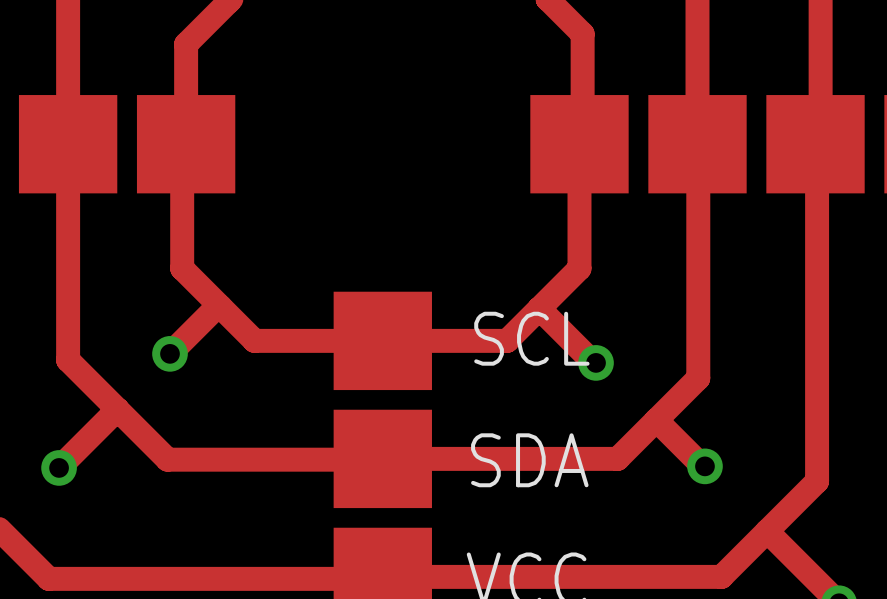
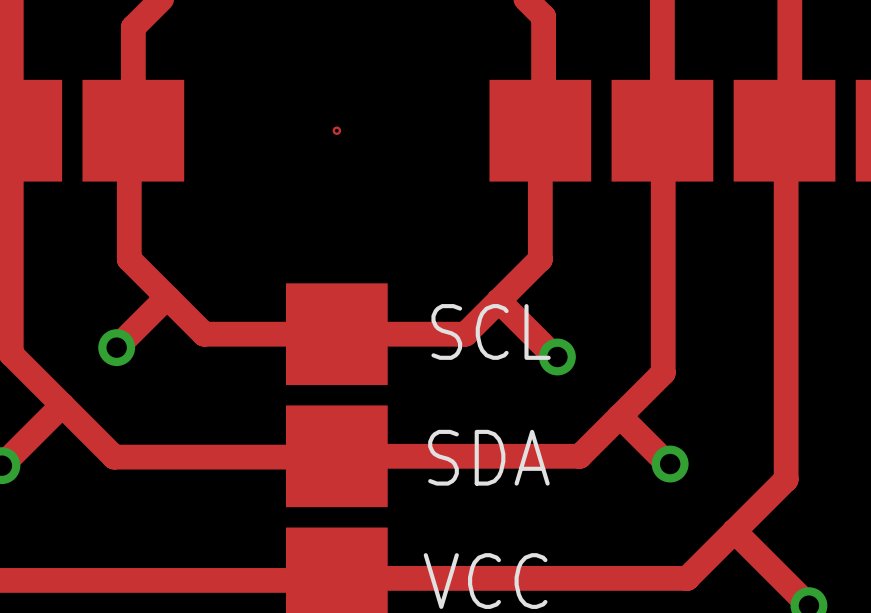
drawing: none -> [332, 126, 342, 135]

